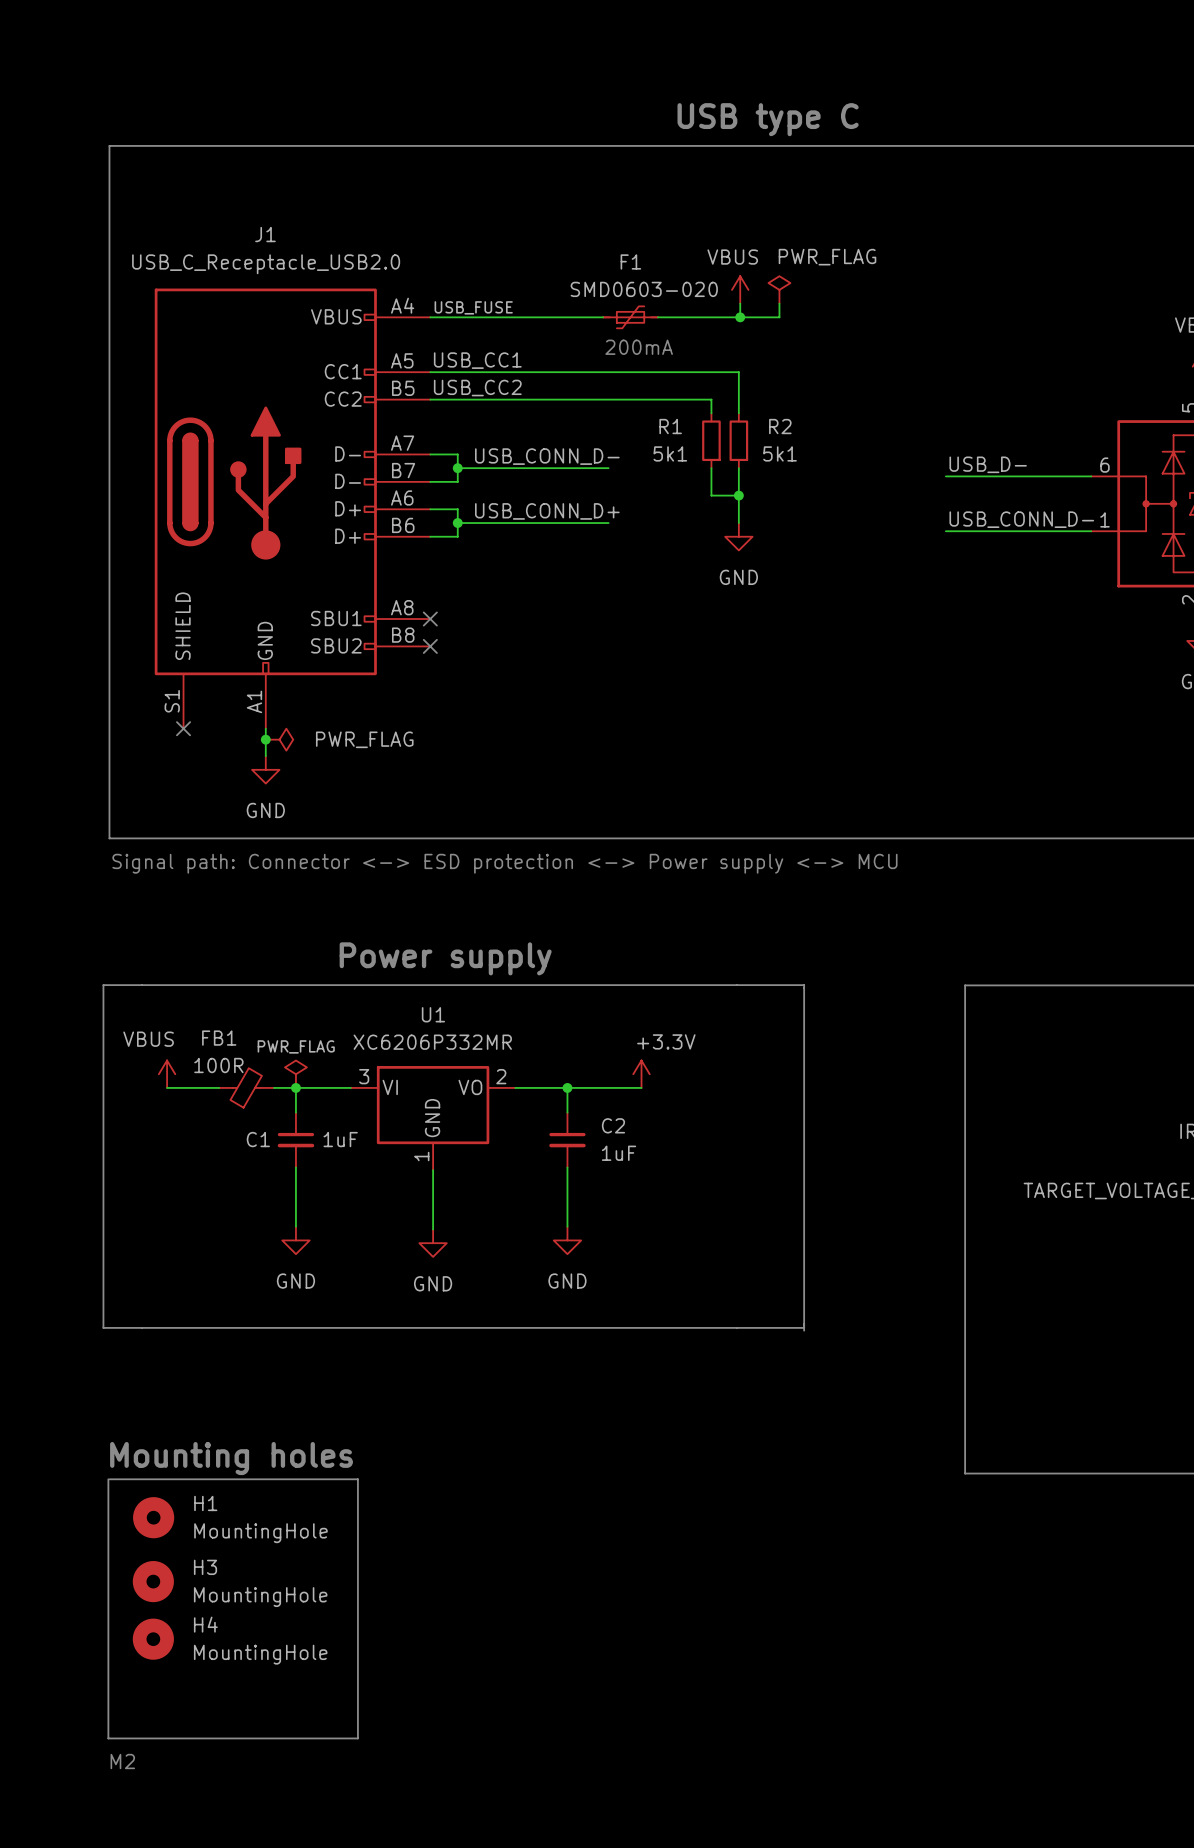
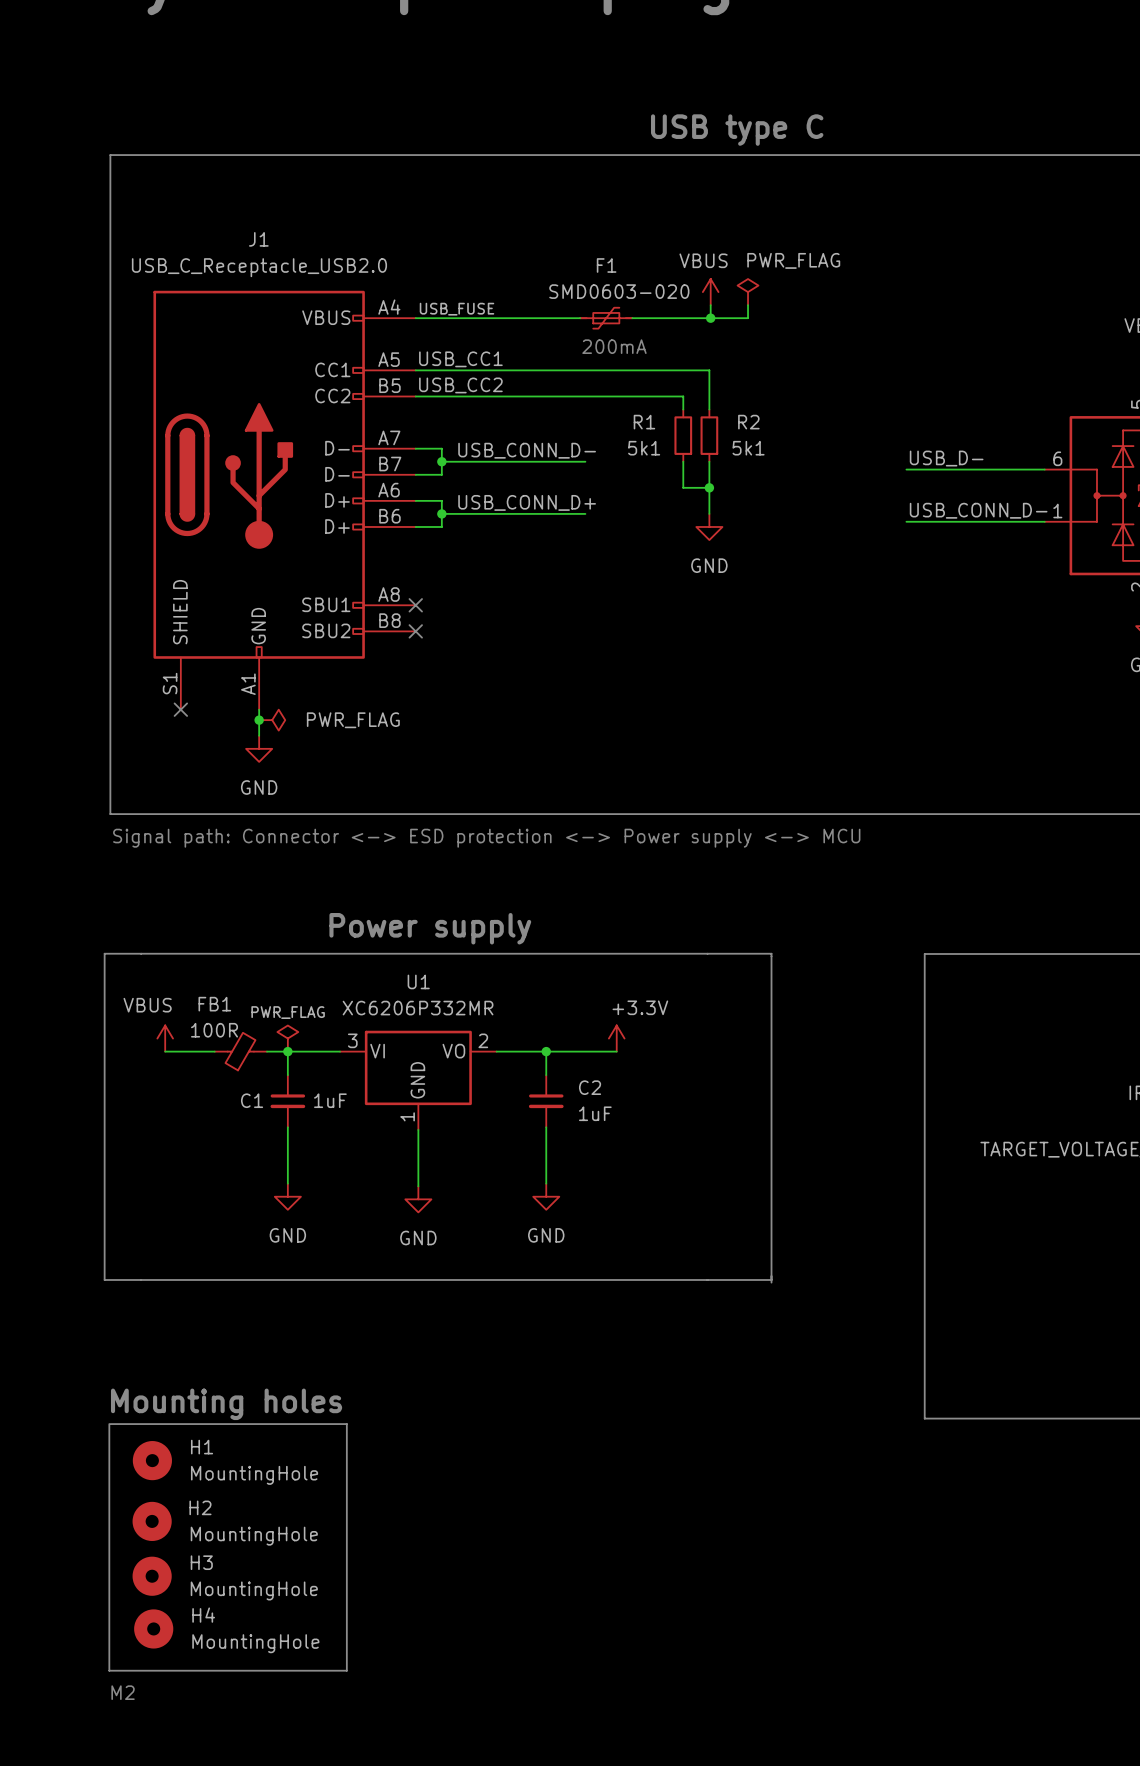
H3 name: H3 (205, 1567) -> H2 (200, 1507)
H4 name: H4 (205, 1624) -> H3 (201, 1562)
H4: none -> MountingHole (153, 1628)

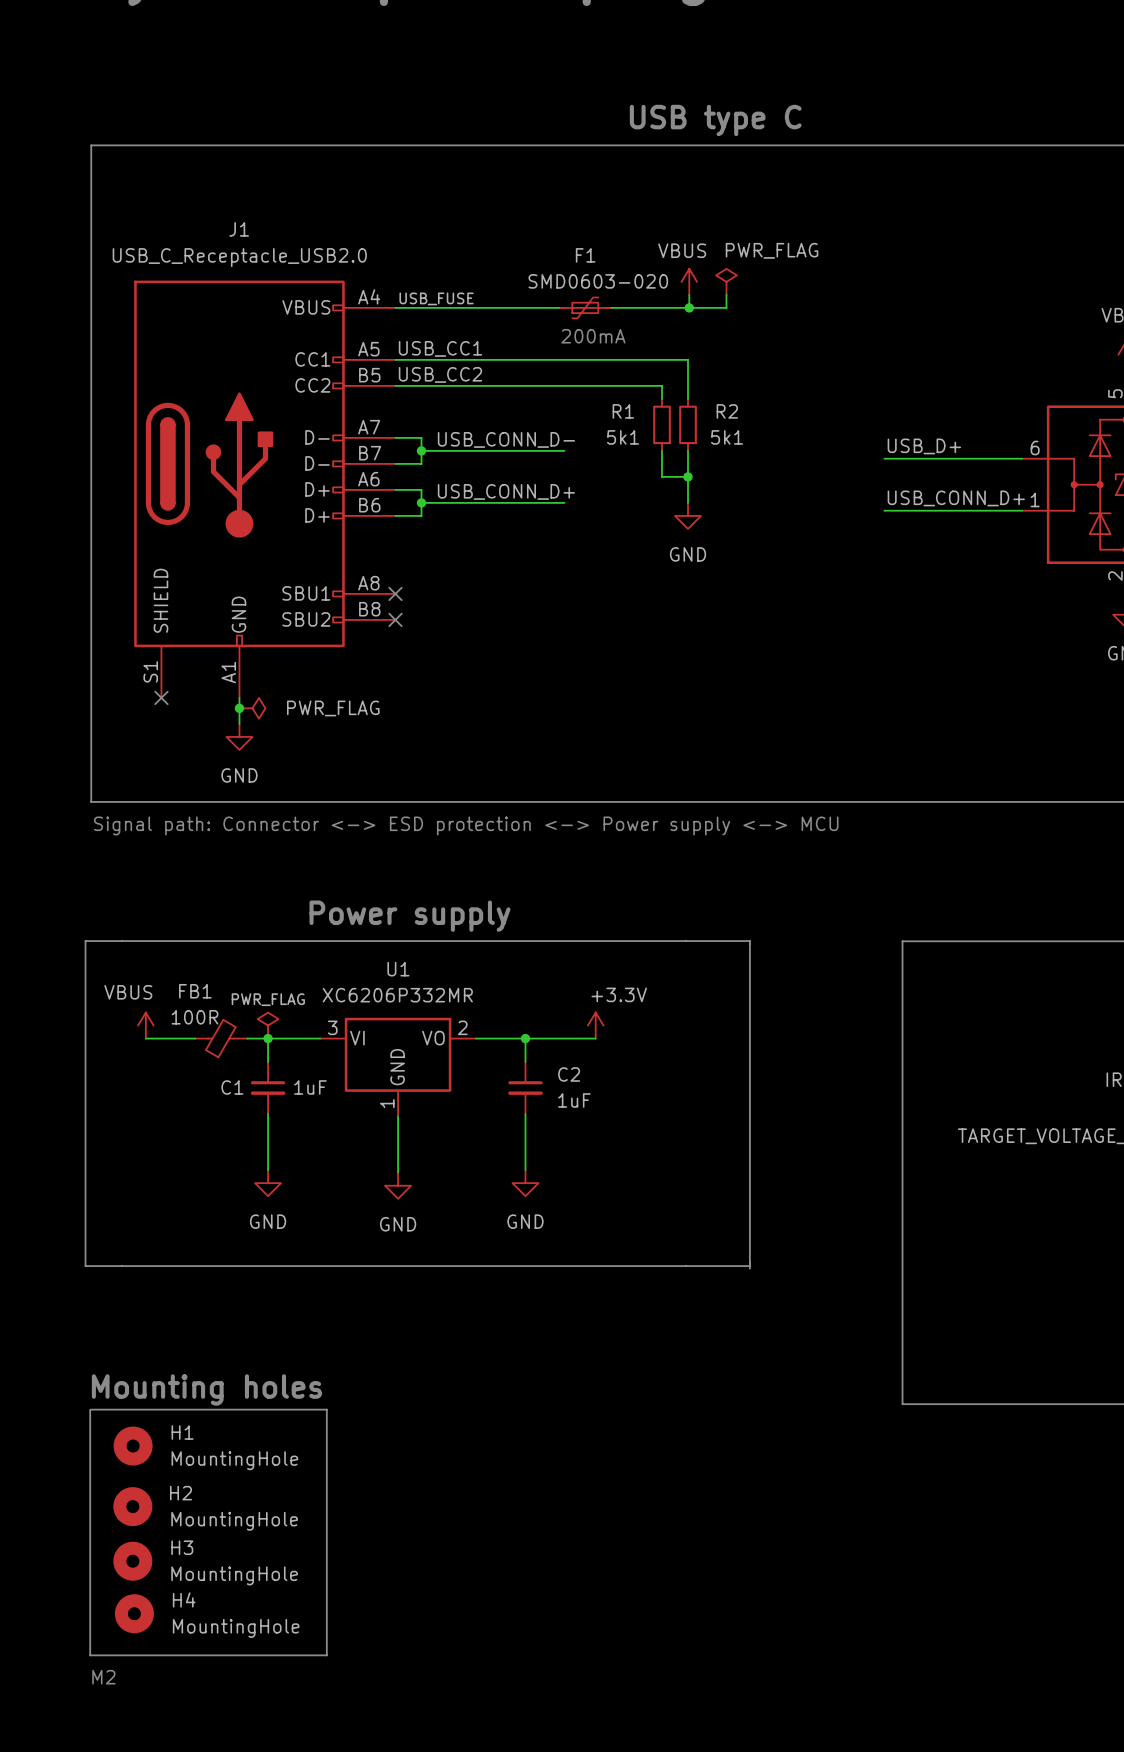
label: USB_D- (946, 458) -> USB_D+ (924, 446)
label: USB_CONN_D- (978, 510) -> USB_CONN_D+ (956, 498)

